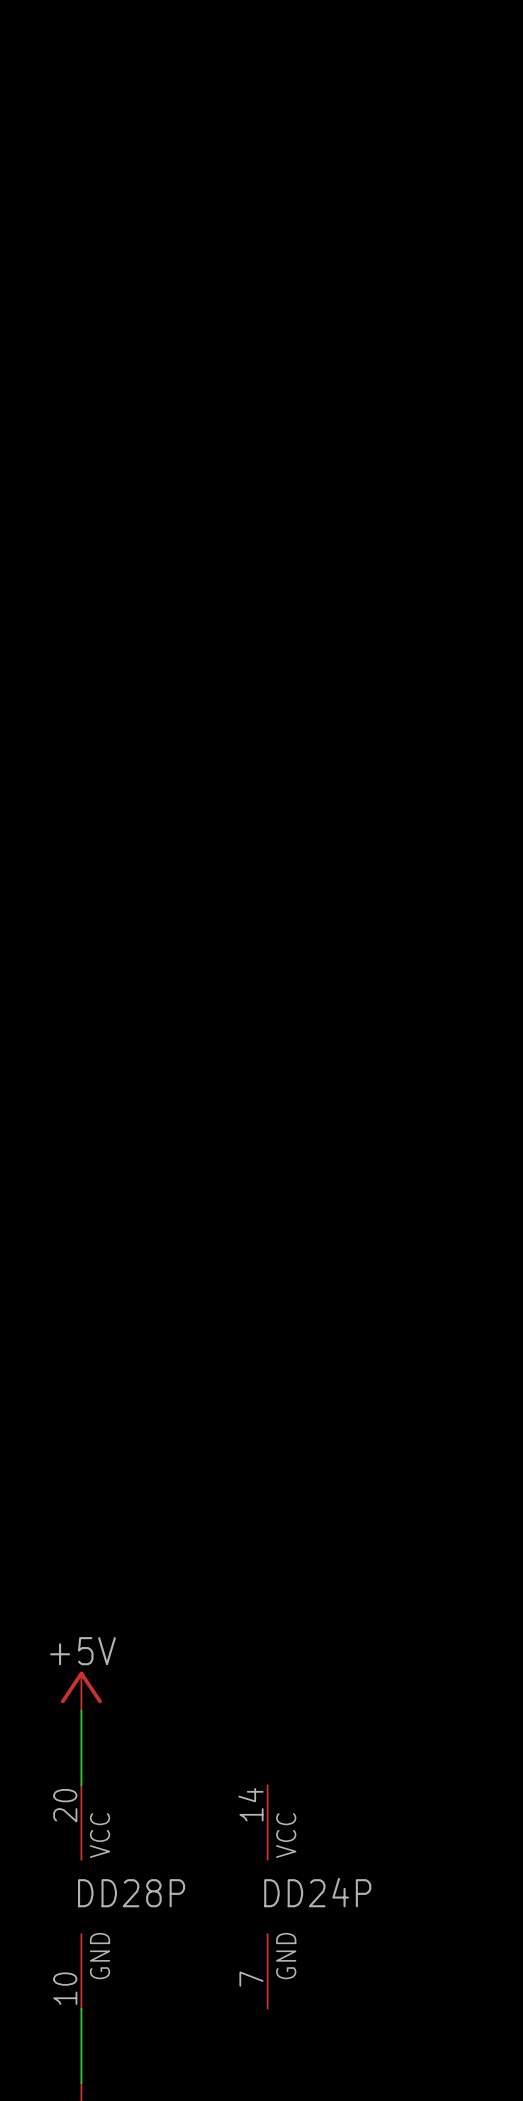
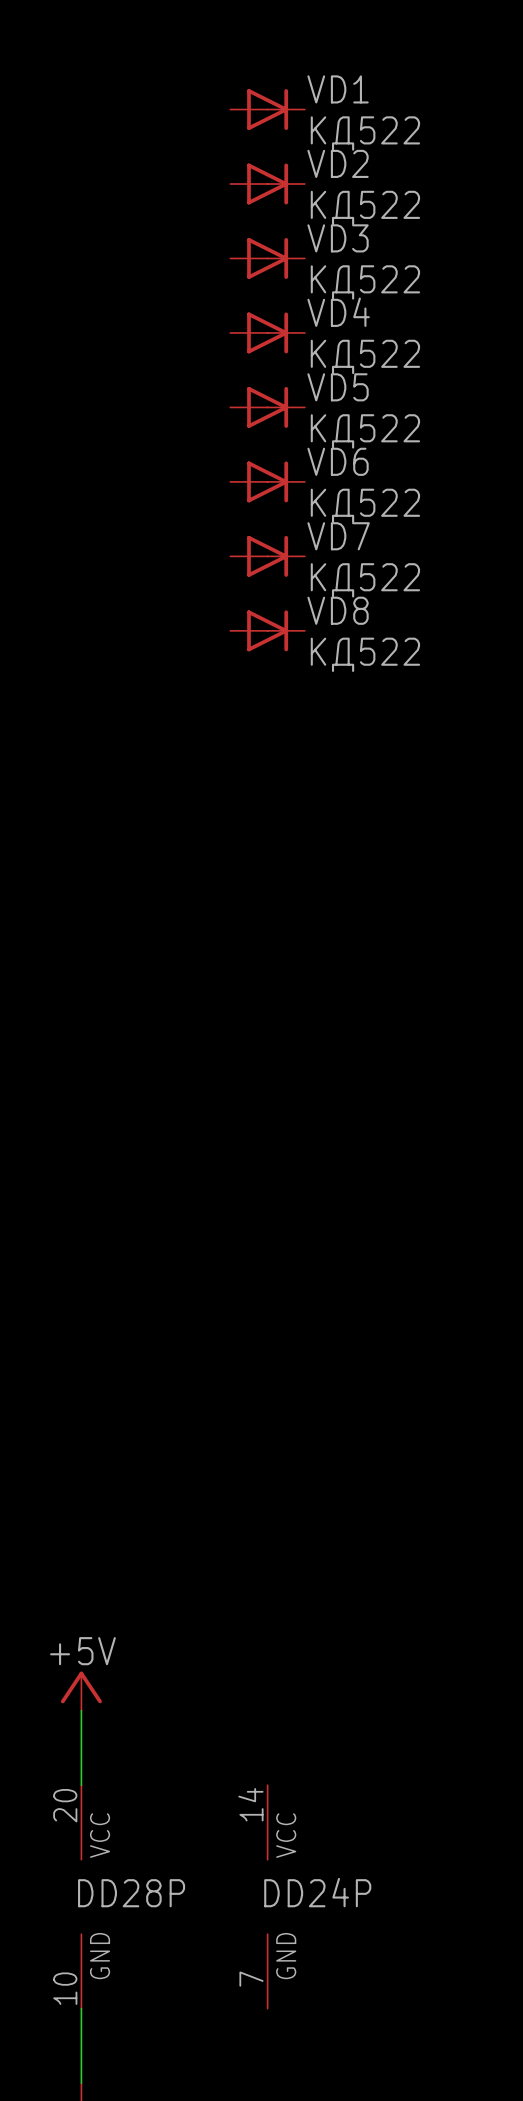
VD1: none -> КД522 (267, 109)
VD2: none -> КД522 (267, 184)
VD3: none -> КД522 (267, 258)
VD4: none -> КД522 (267, 332)
VD5: none -> КД522 (267, 407)
VD6: none -> КД522 (267, 481)
VD7: none -> КД522 (267, 556)
VD8: none -> КД522 (267, 630)

